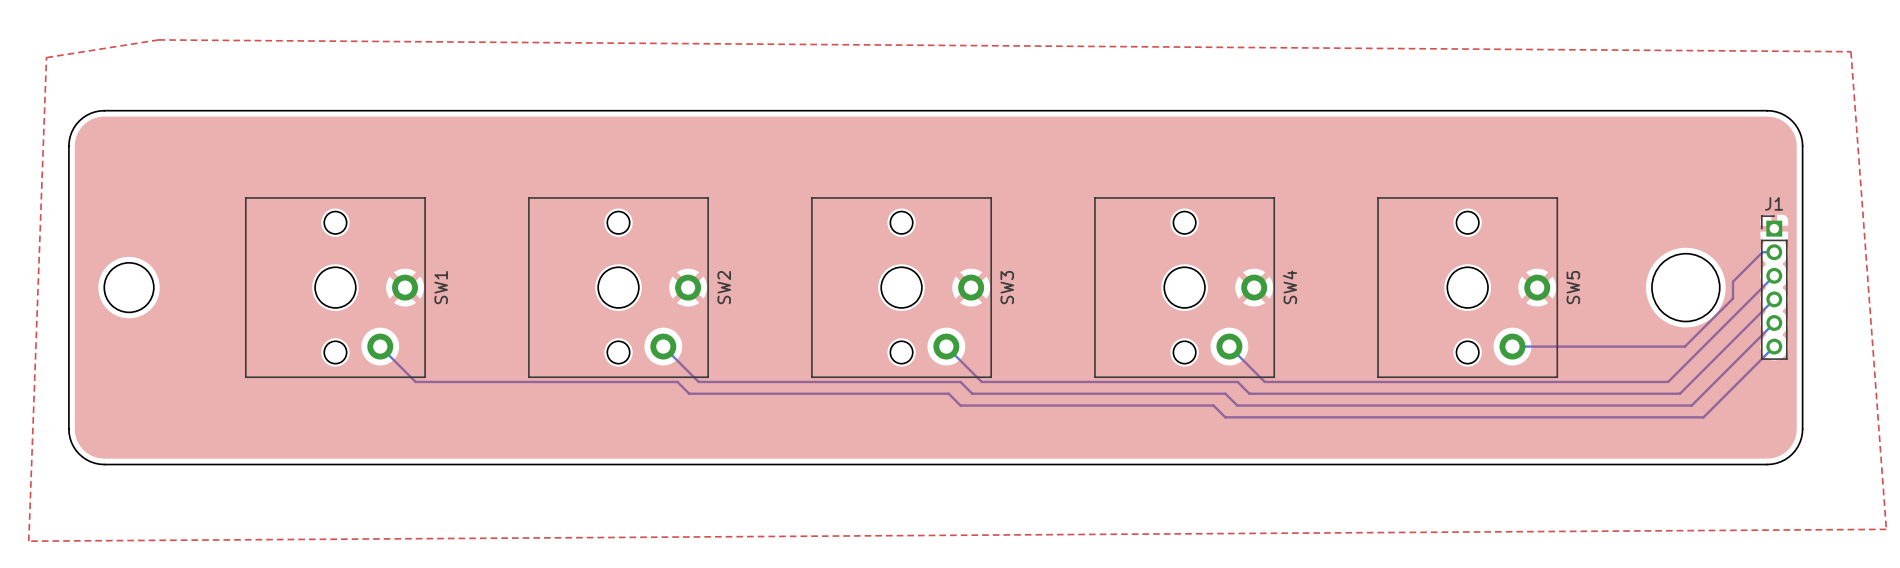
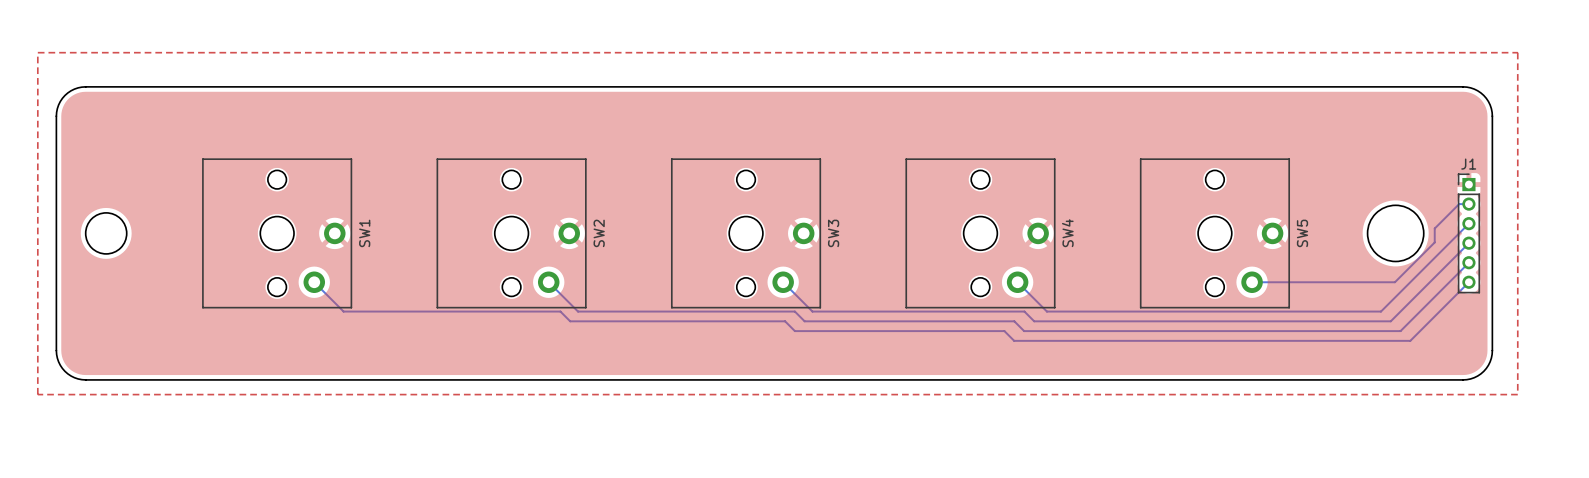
top zone outline: (158, 39) (46, 57) (28, 541) (1886, 529) (1850, 51) (158, 39) -> (37, 52) (37, 394) (1517, 394) (1517, 52) (37, 52)

